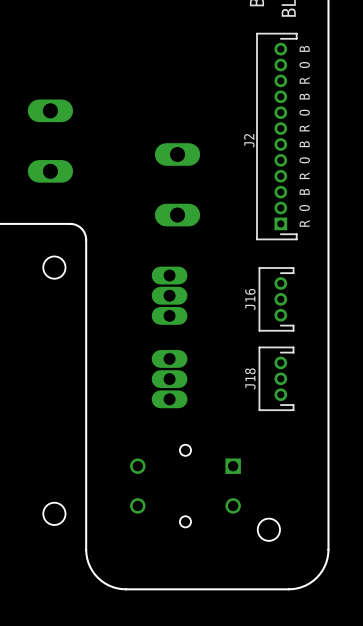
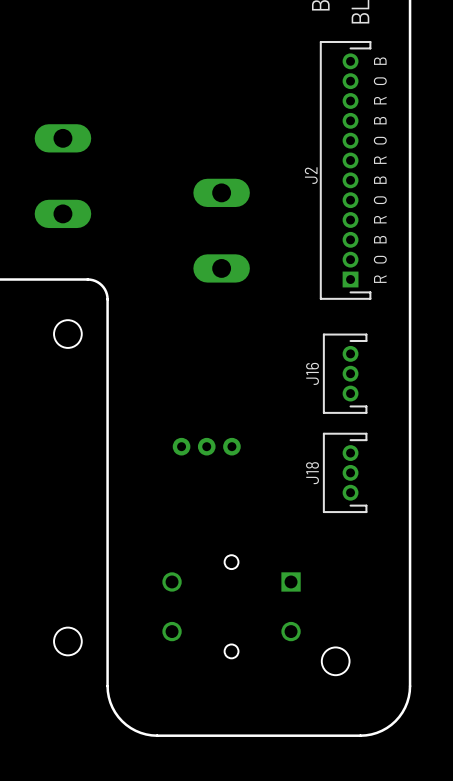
part: (169, 295) -> none
part: none -> (206, 446)
part: (169, 379) -> none

